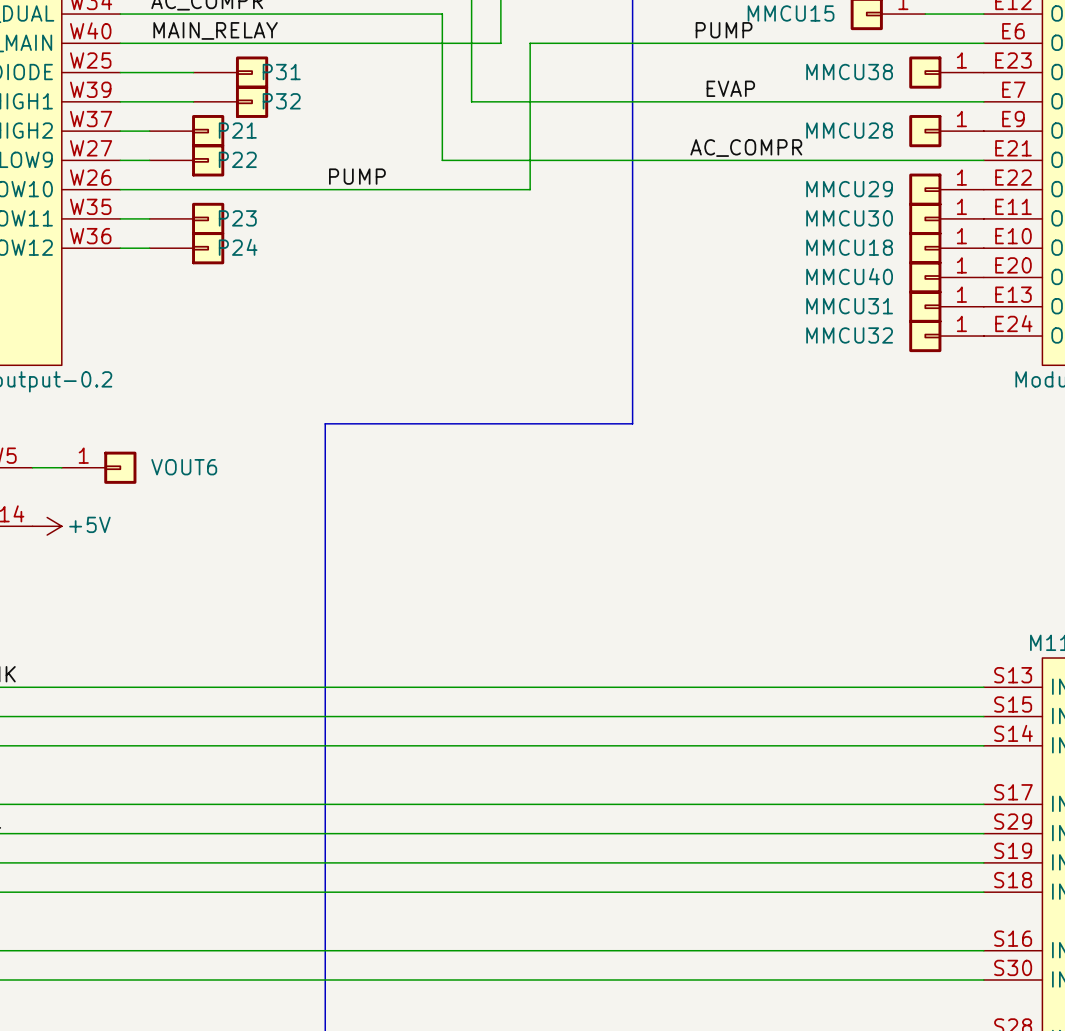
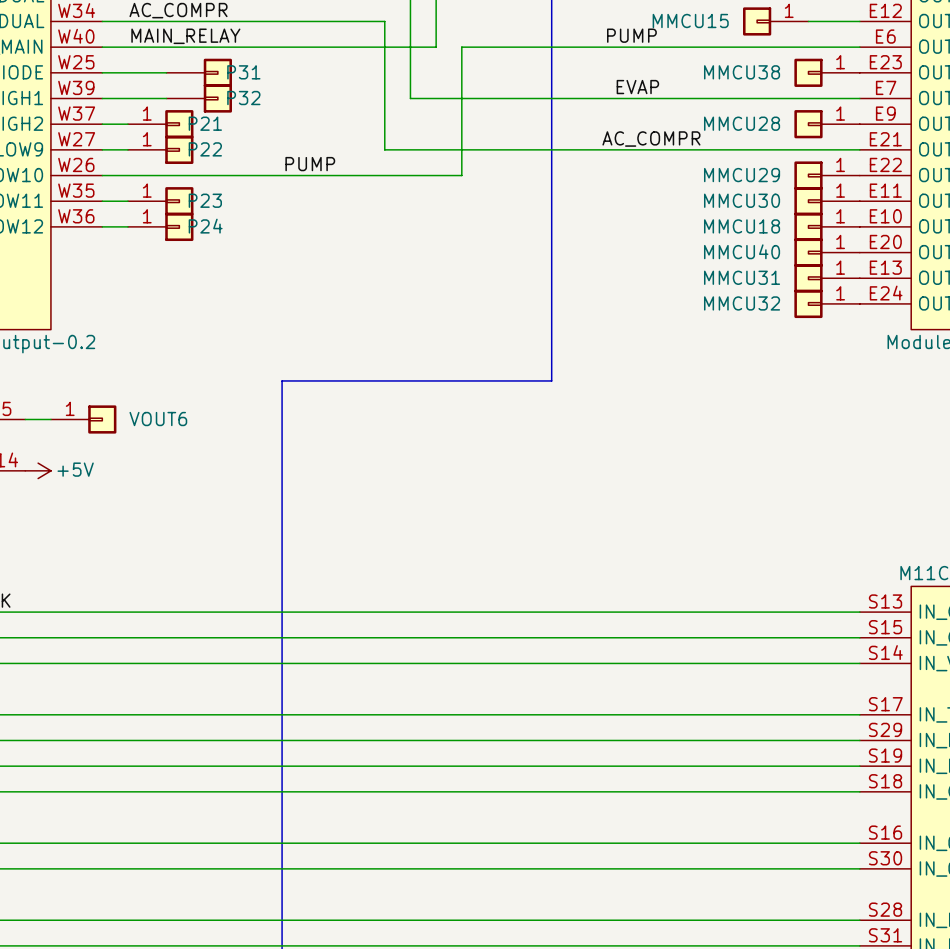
P21 pin number: none -> 1 (147, 113)
P22 pin number: none -> 1 (147, 139)
P23 pin number: none -> 1 (147, 190)
P24 pin number: none -> 1 (147, 216)

